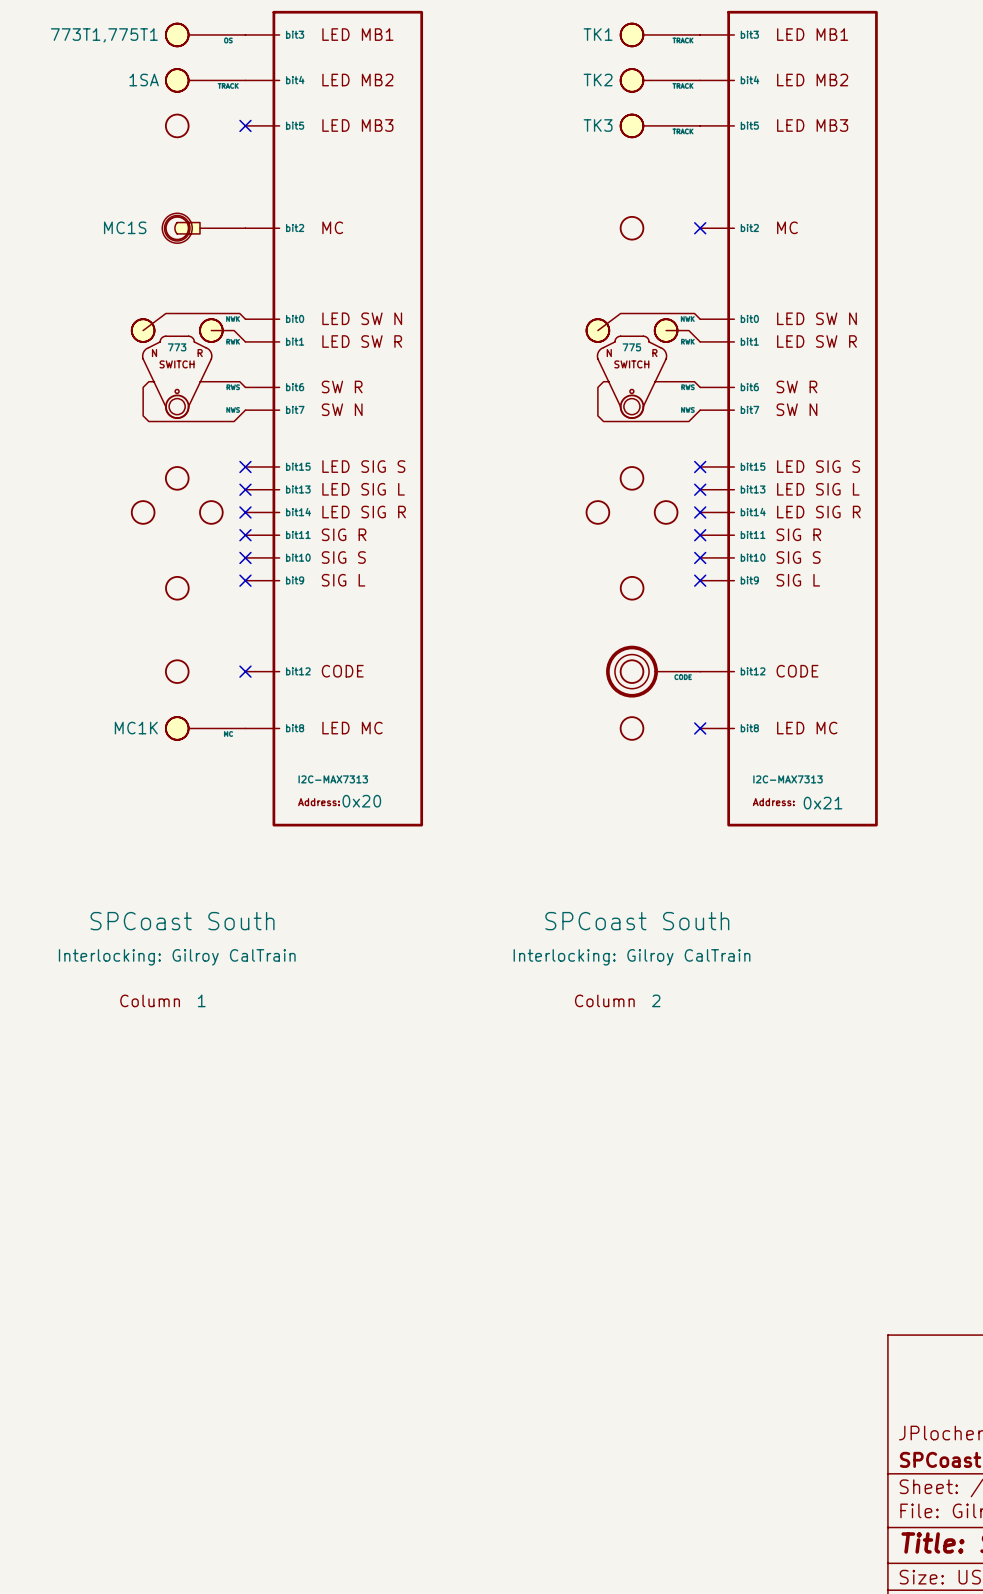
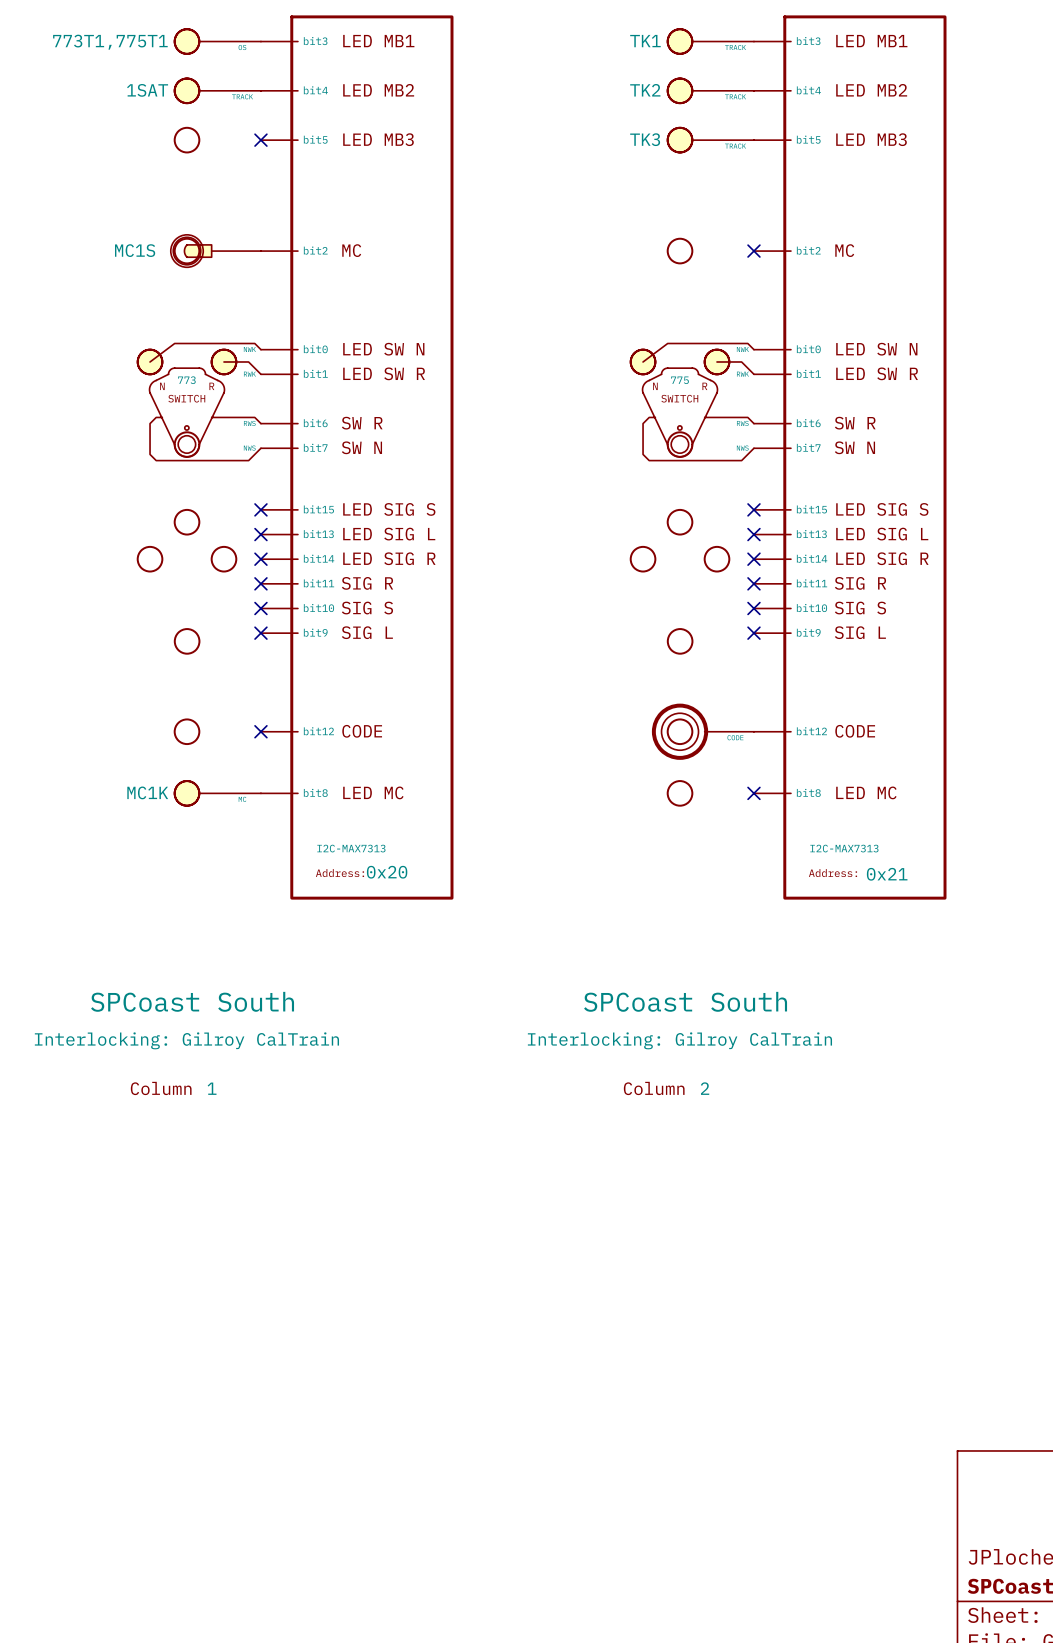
part text: 1SA (144, 80) -> 1SAT (147, 90)

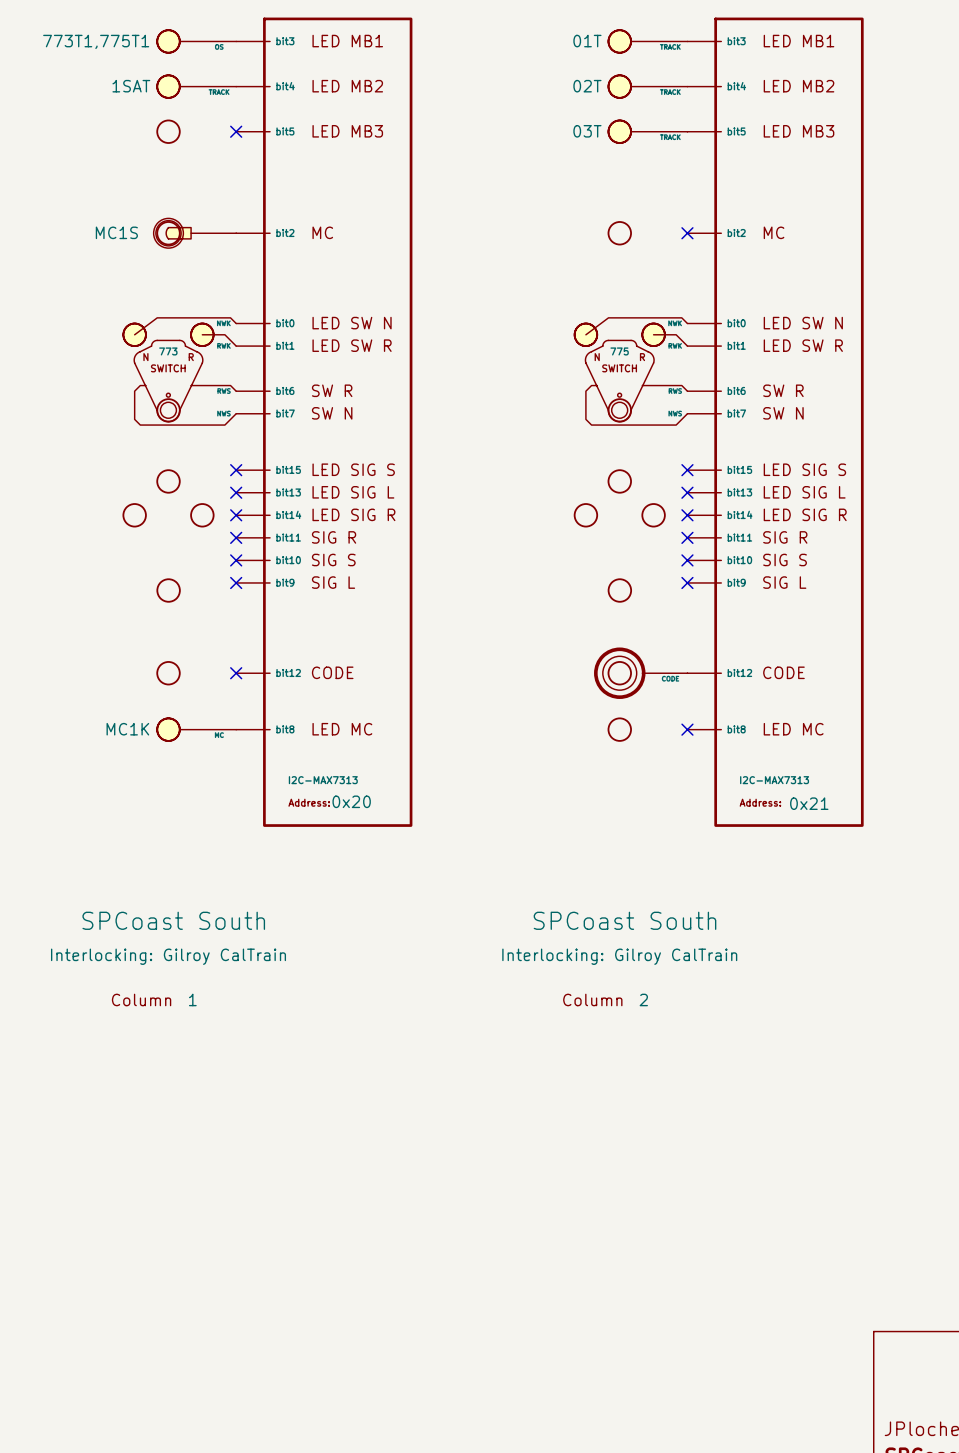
part text: TK1 (645, 41) -> 01T (587, 41)
part text: TK2 (645, 90) -> 02T (587, 86)
part text: TK3 (645, 139) -> 03T (587, 131)

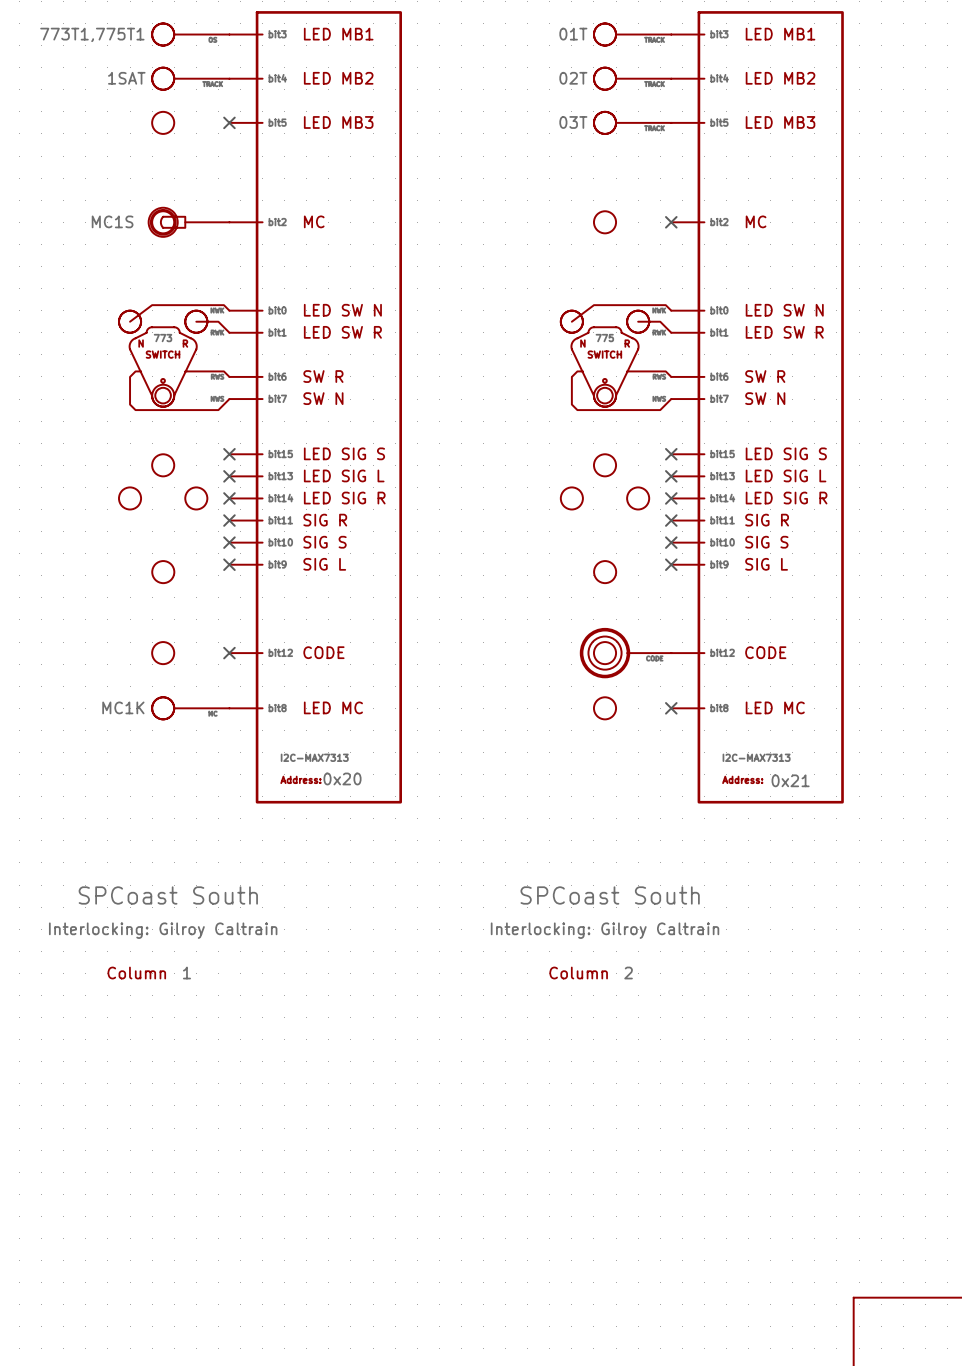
part text: Interlocking: Gilroy CalTrain (168, 956) -> Interlocking: Gilroy Caltrain (163, 930)
part text: Interlocking: Gilroy CalTrain (619, 956) -> Interlocking: Gilroy Caltrain (605, 930)

